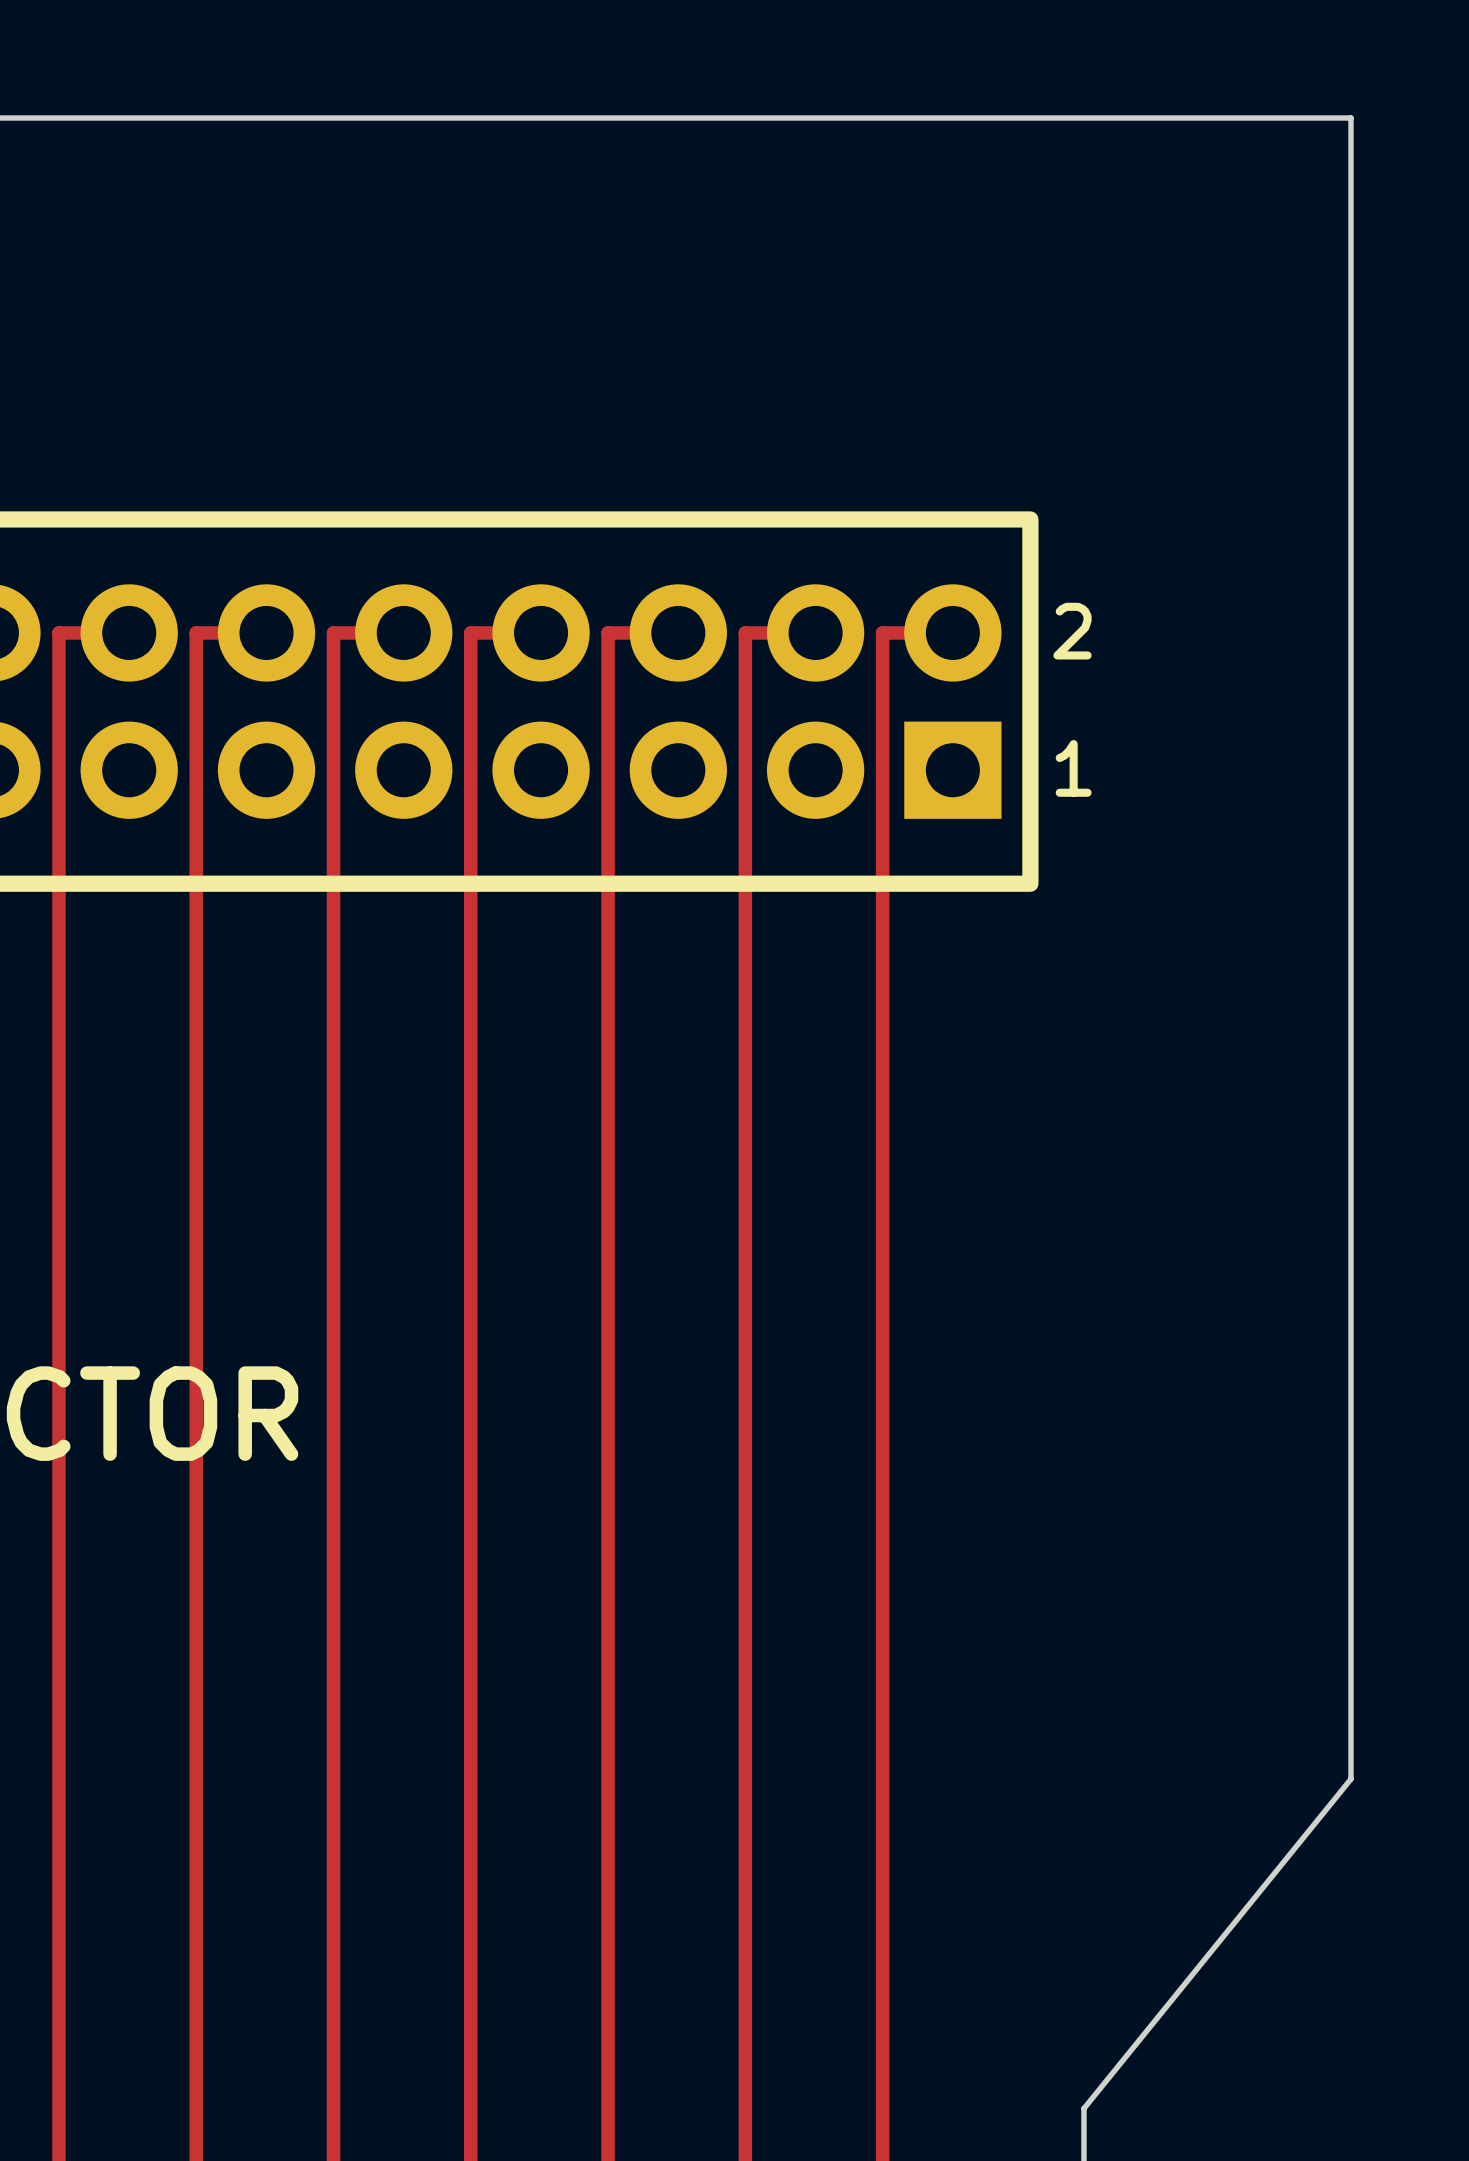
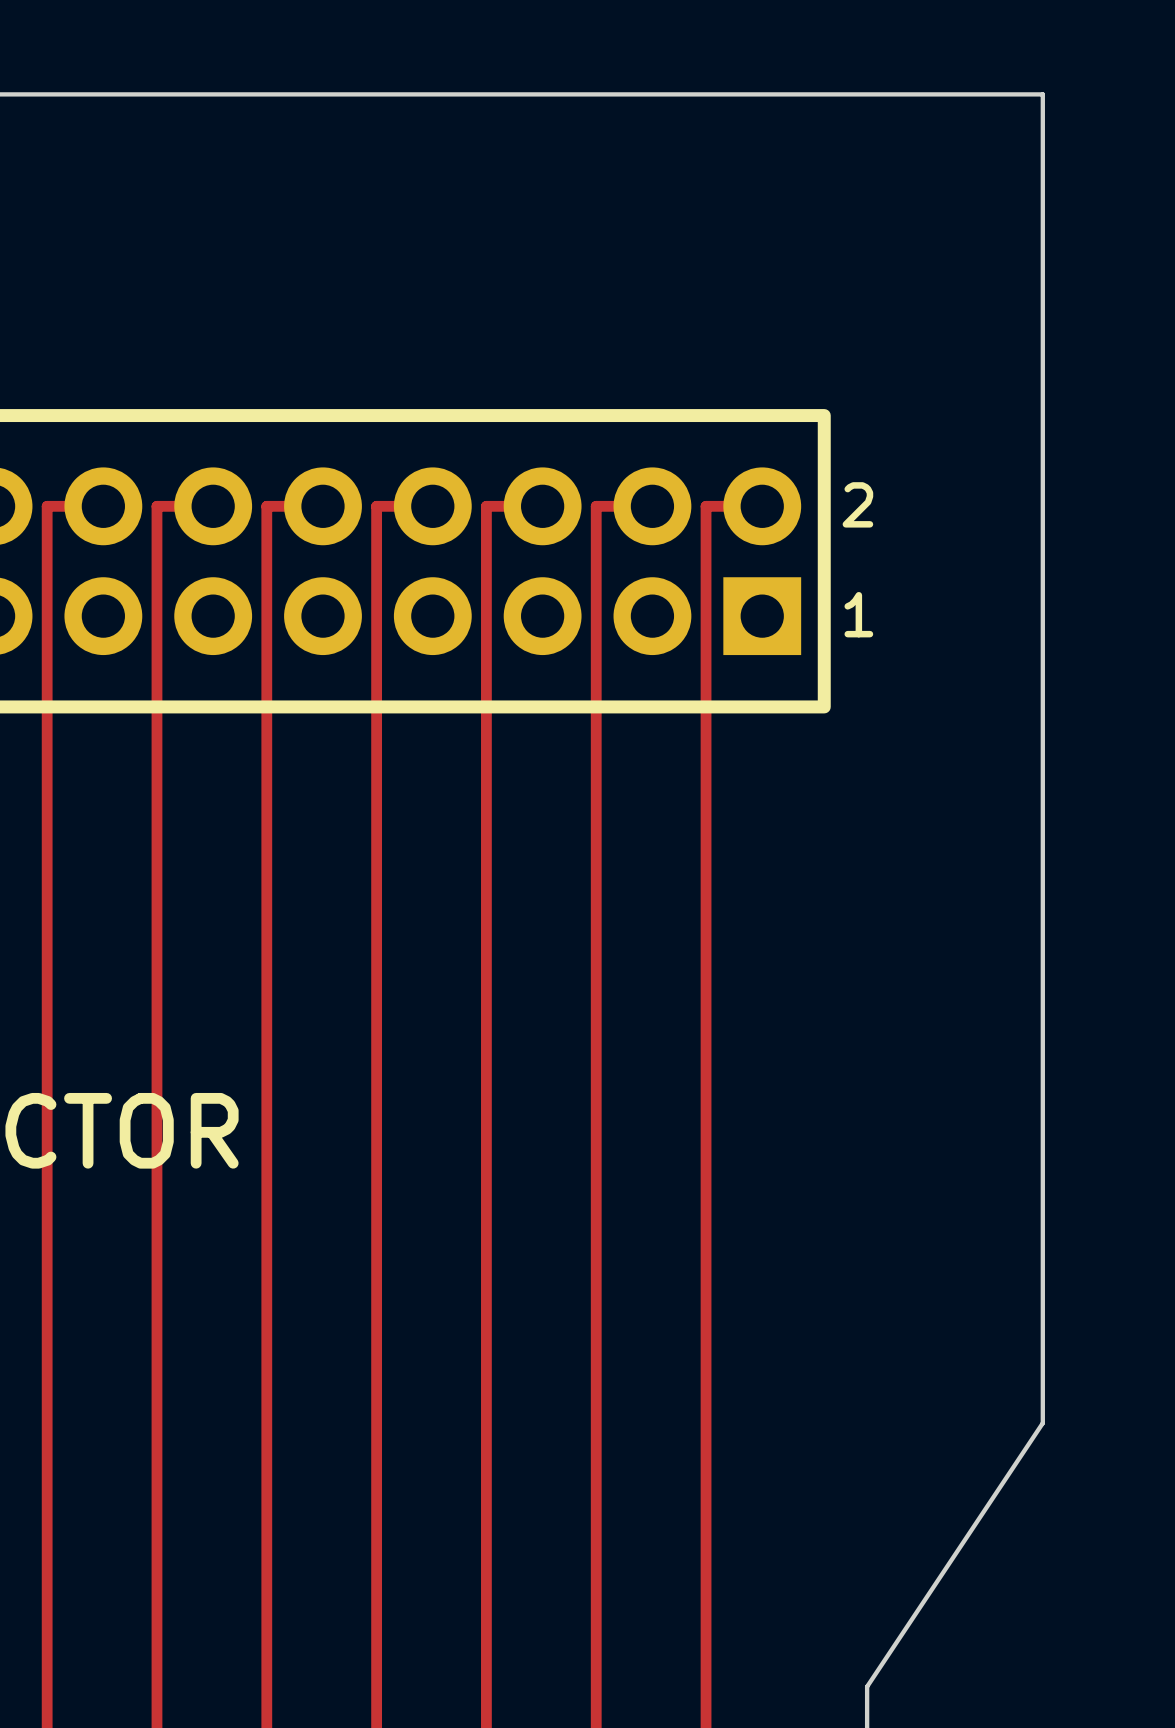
board edge: (1303, 118) (1350, 118) (1350, 1779) (1083, 2108) -> (1042, 94) (1042, 1423) (867, 1686)

